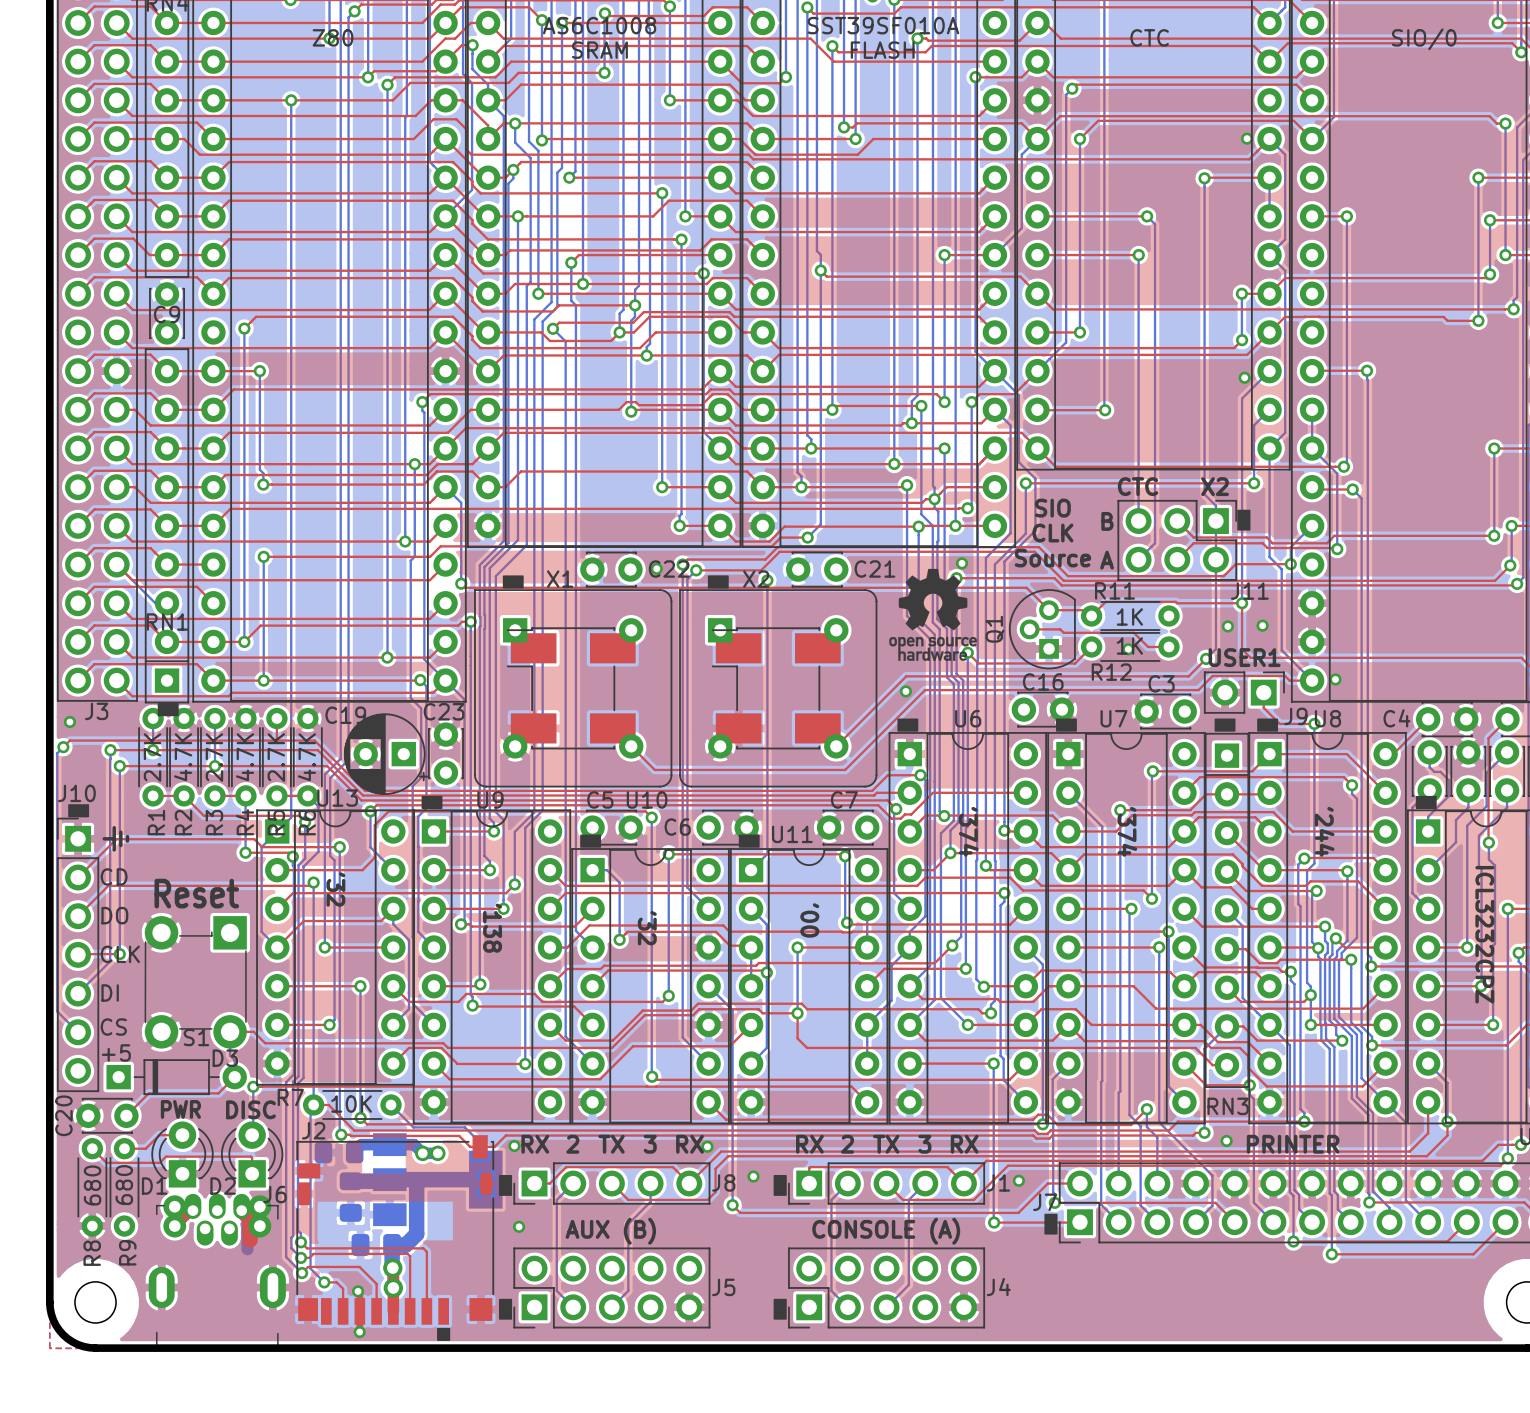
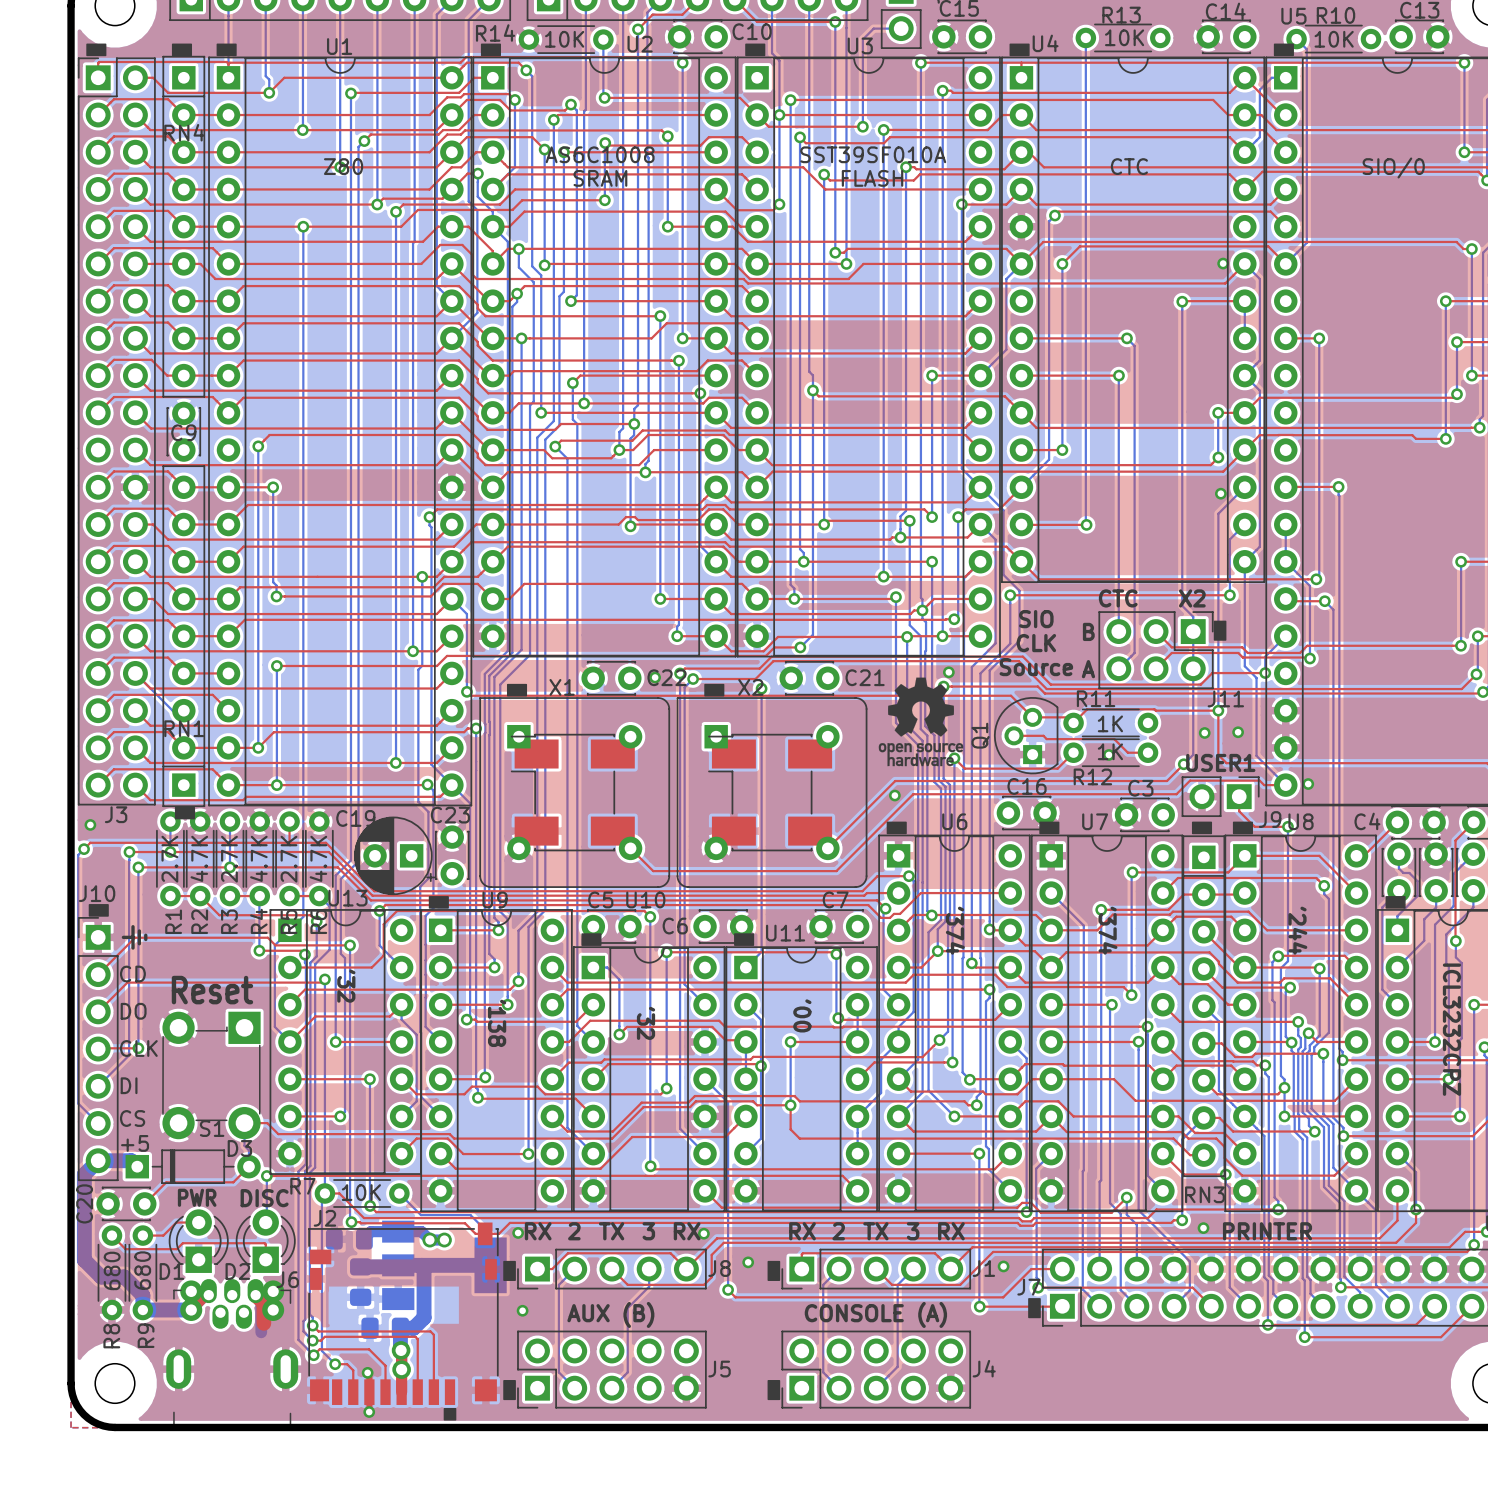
bottom track: none -> (137, 1166) (131, 1160) (98, 1160) (84, 1174) (84, 1260) (101, 1276) (124, 1276) (142, 1295) (142, 1310) (191, 1310)

